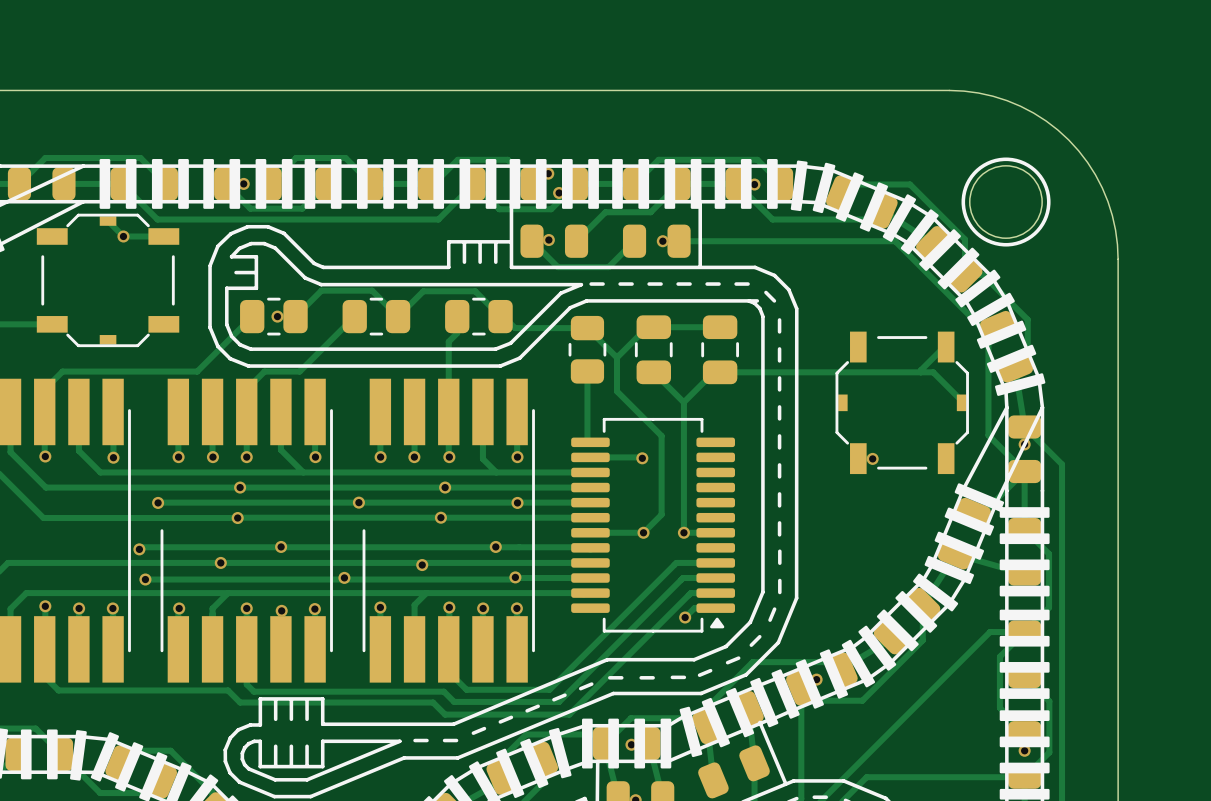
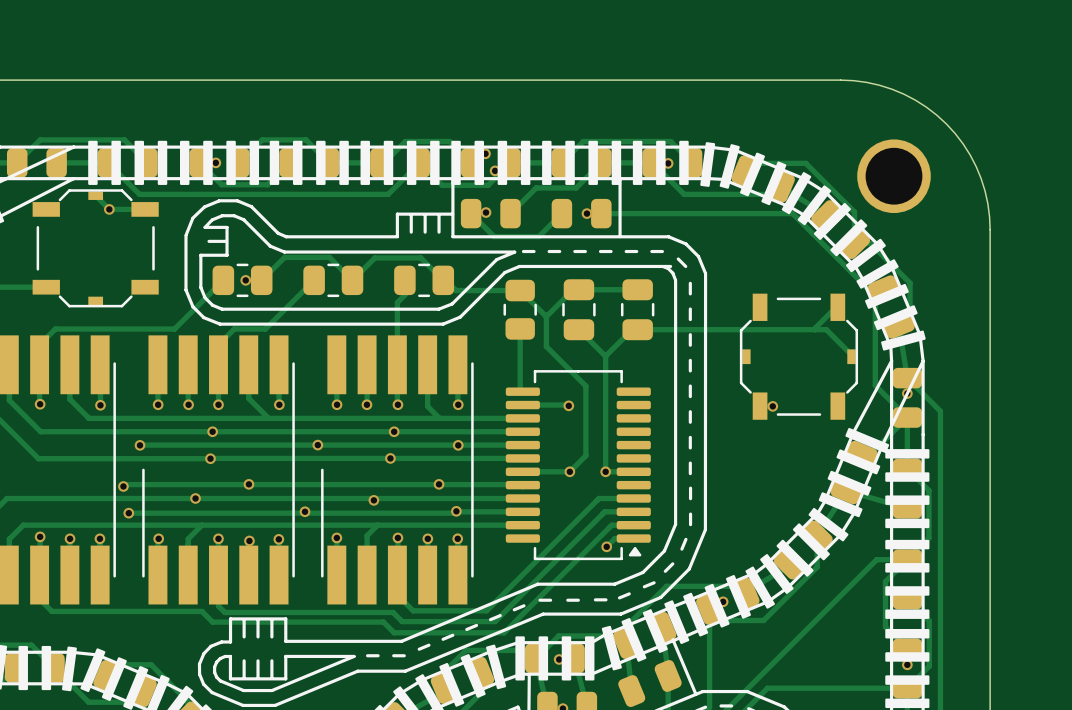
drawing: [961, 157, 1051, 247] -> none
round board edge: [969, 165, 1043, 239] -> none
part: none -> (894, 176)

